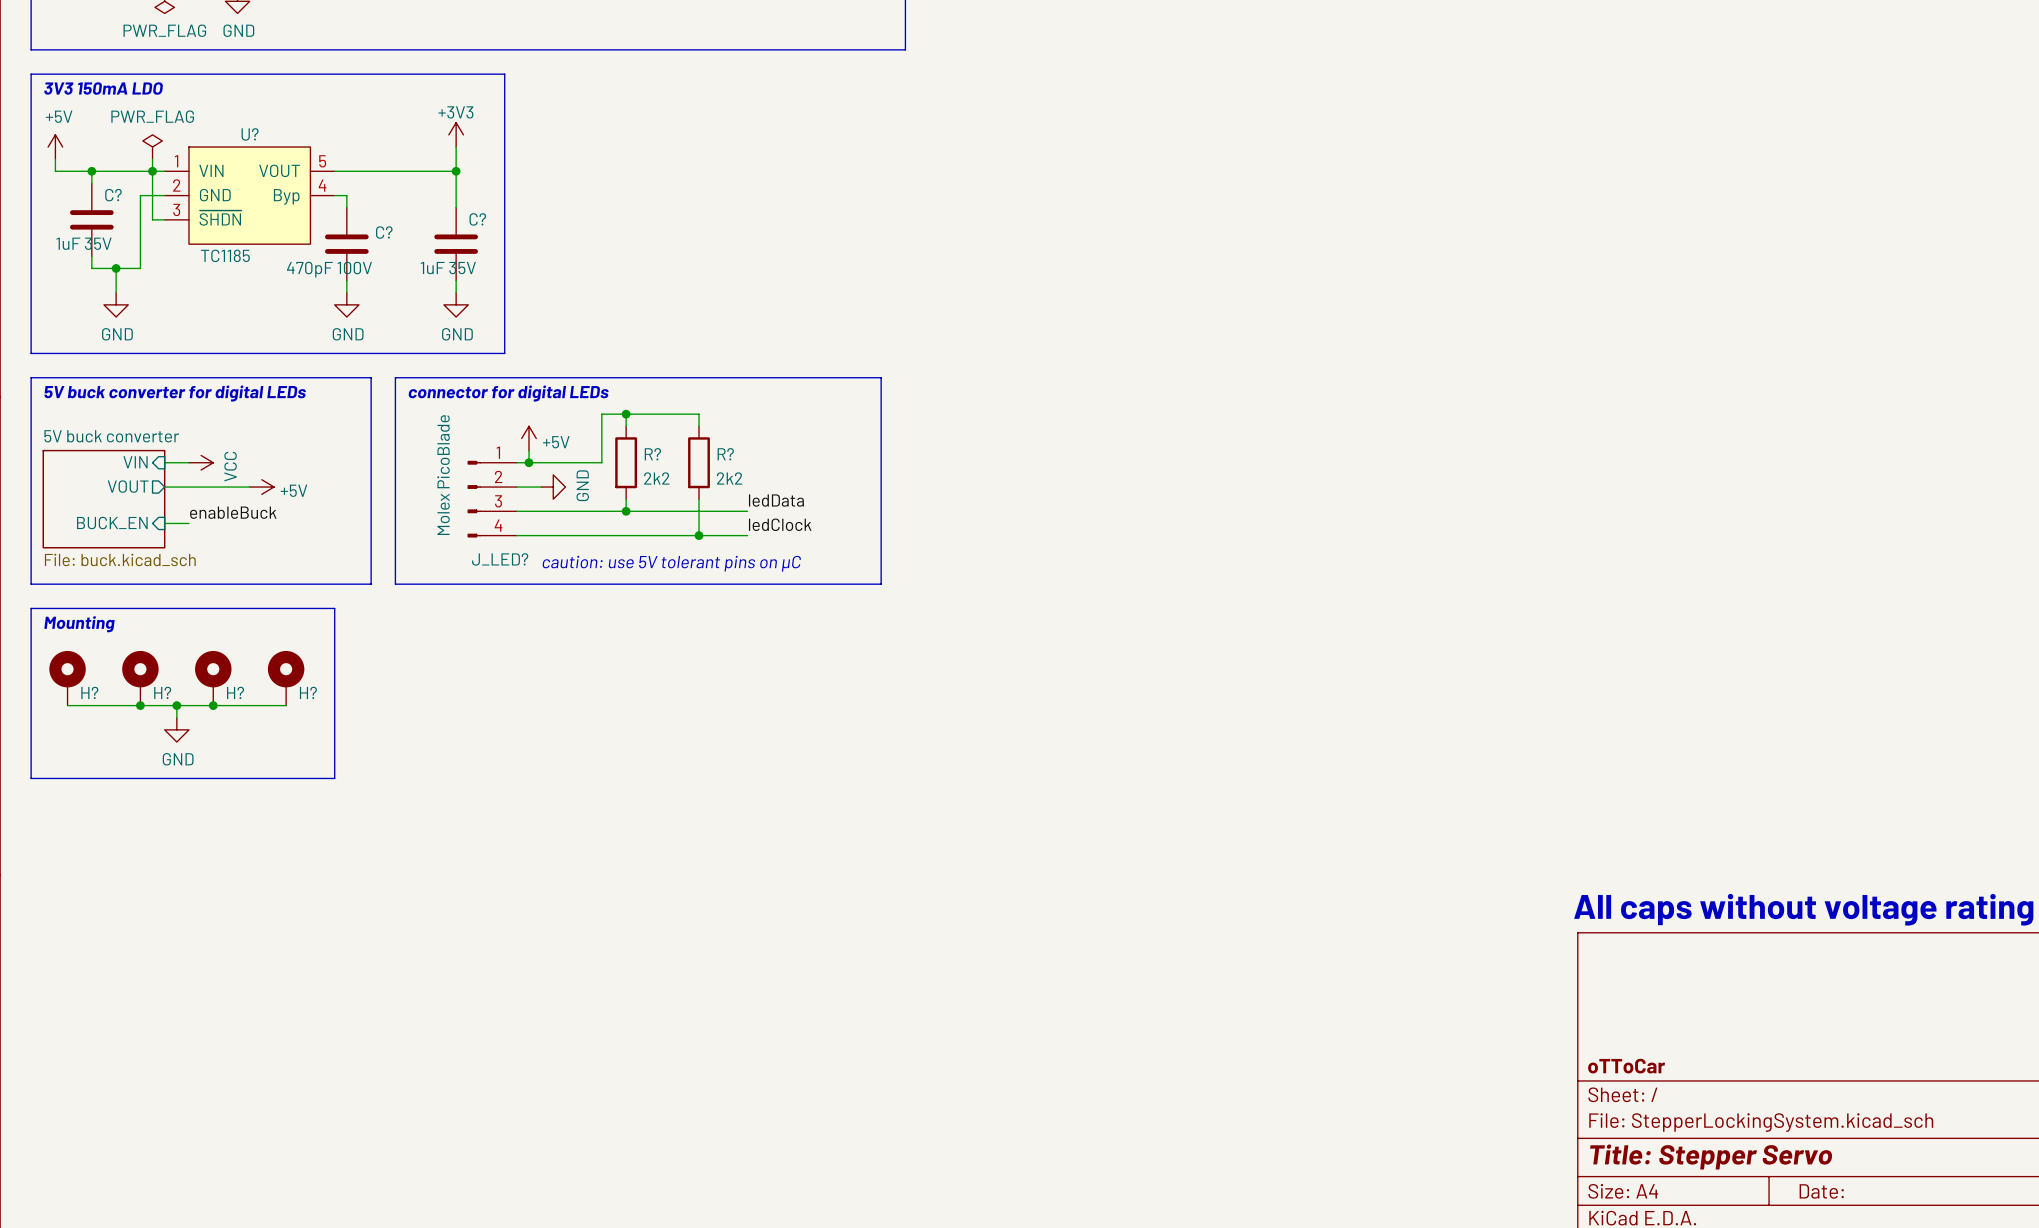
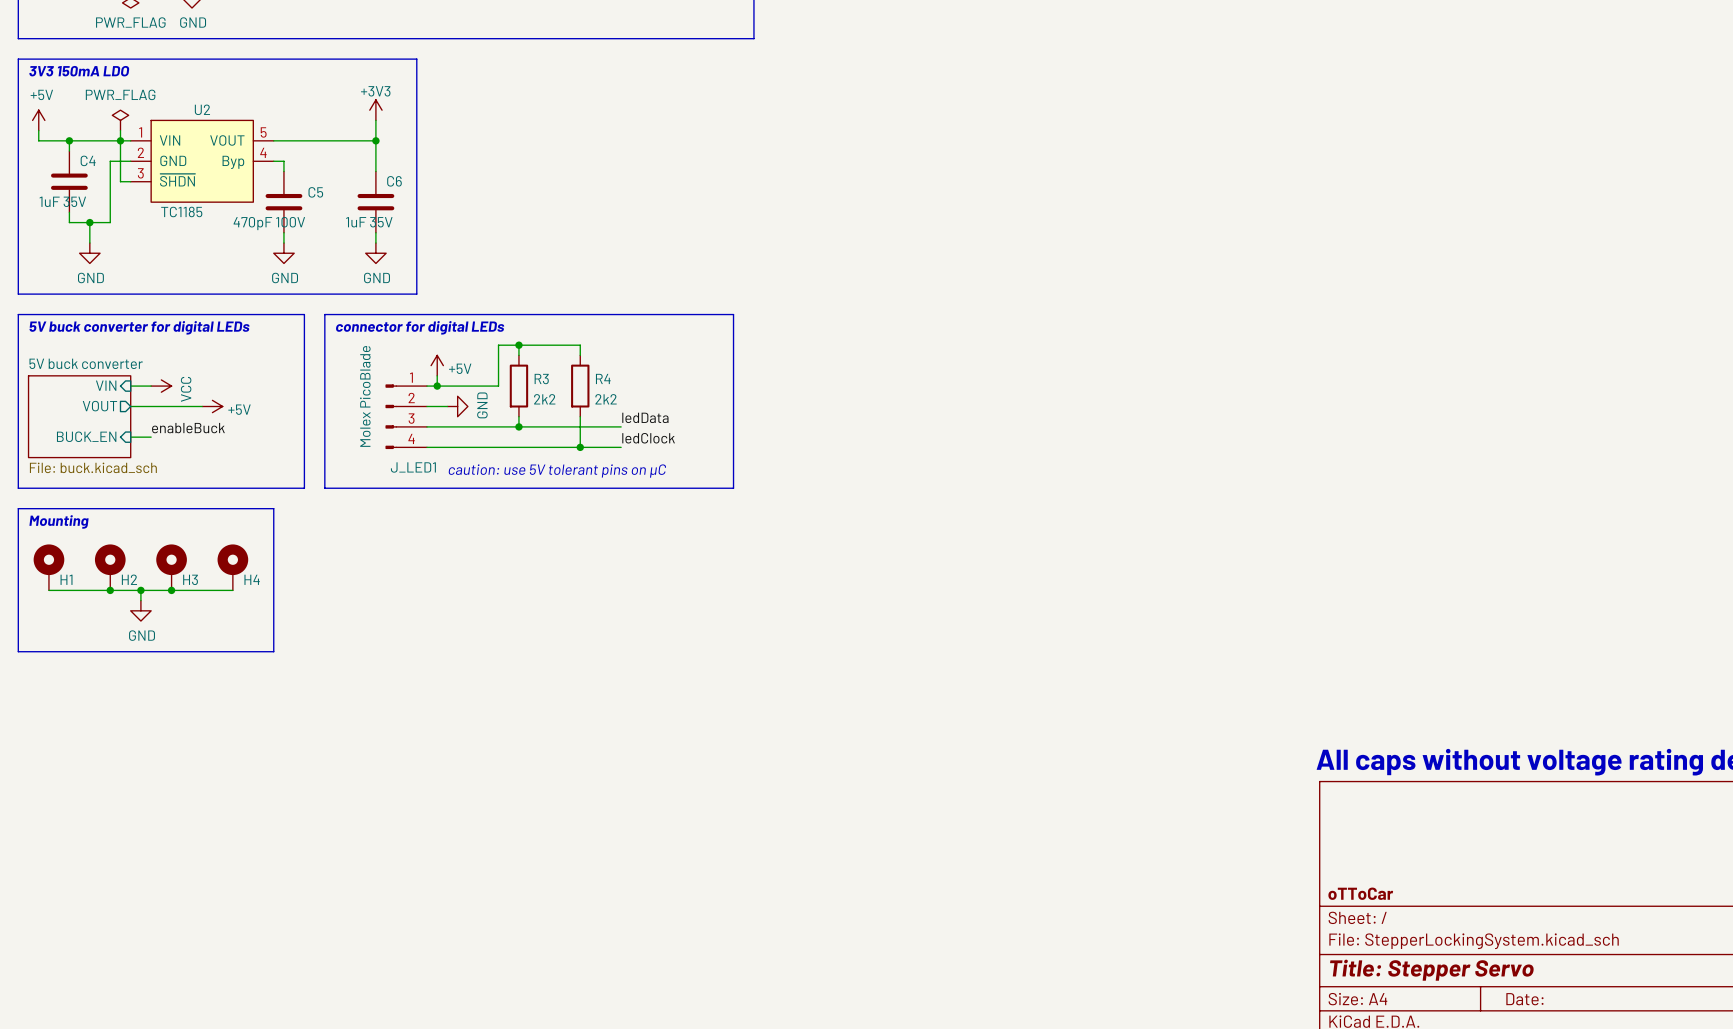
U? name: U? (250, 134) -> U2 (202, 109)
C? name: C? (113, 195) -> C4 (88, 160)
C? name: C? (477, 219) -> C6 (394, 181)
C? name: C? (384, 232) -> C5 (315, 192)
R? name: R? (652, 454) -> R3 (541, 379)
R? name: R? (725, 454) -> R4 (603, 378)
J_LED? name: J_LED? (500, 559) -> J_LED1 (413, 467)
H? name: H? (89, 692) -> H1 (66, 579)
H? name: H? (162, 692) -> H2 (129, 579)
H? name: H? (235, 692) -> H3 (190, 579)
H? name: H? (308, 692) -> H4 (252, 579)

